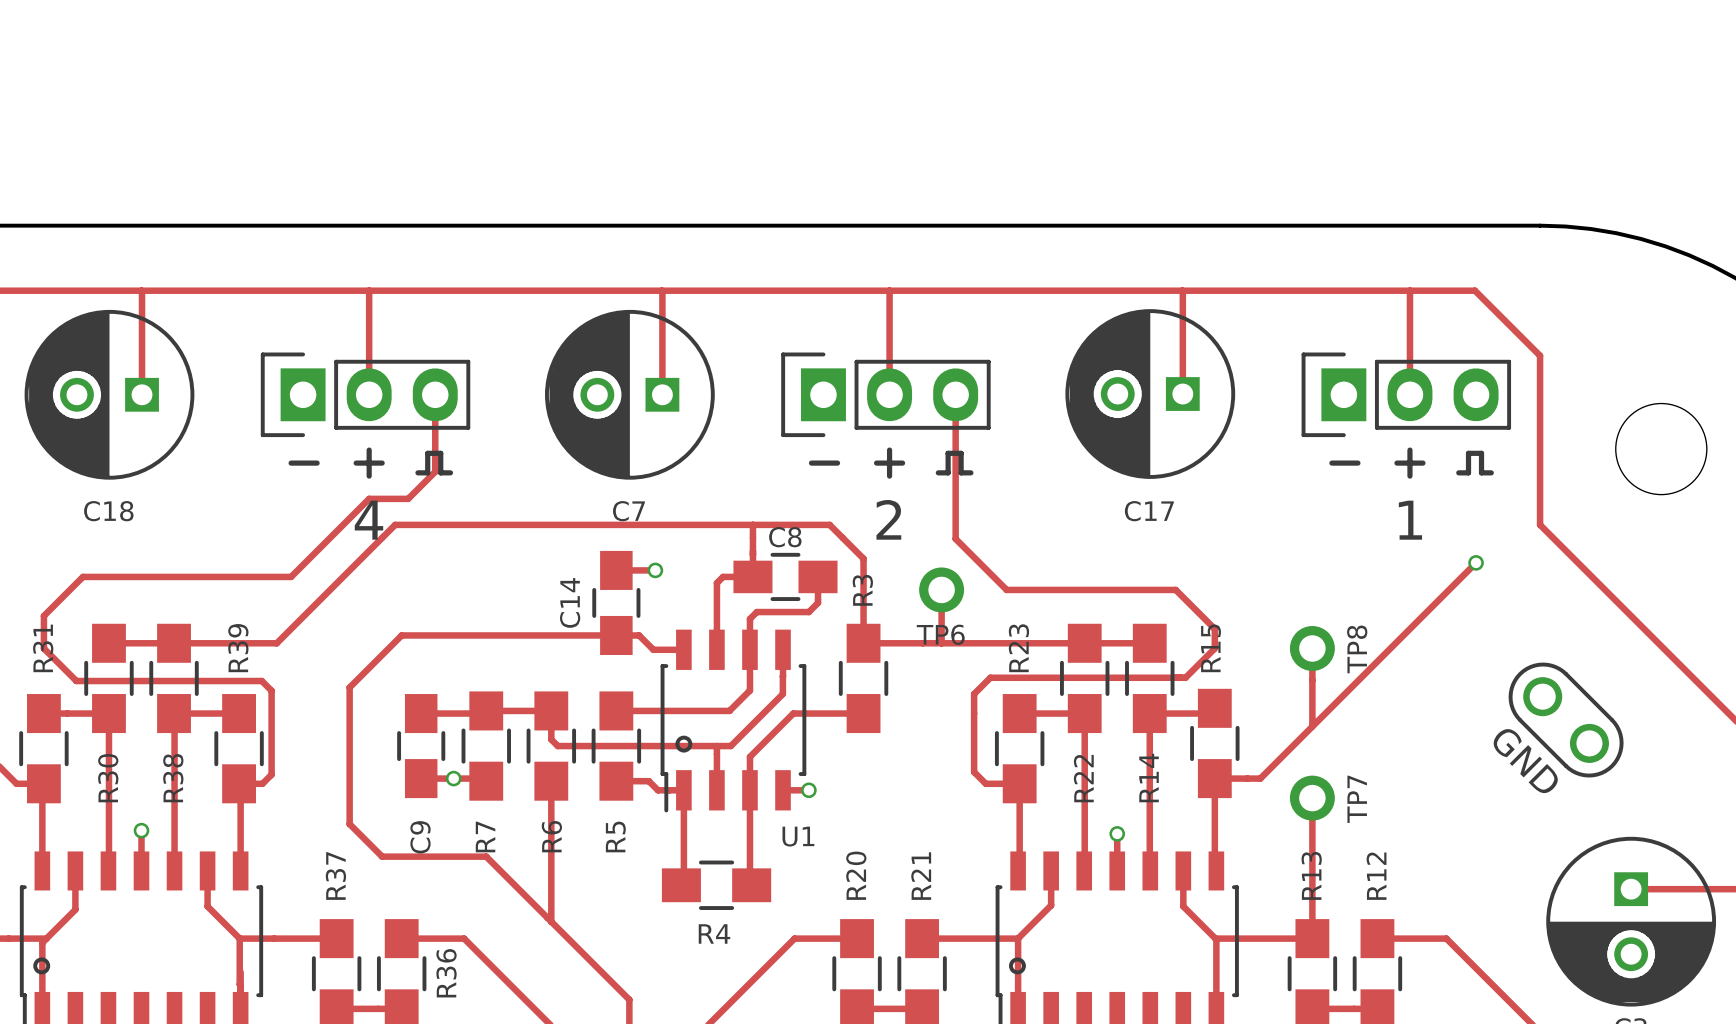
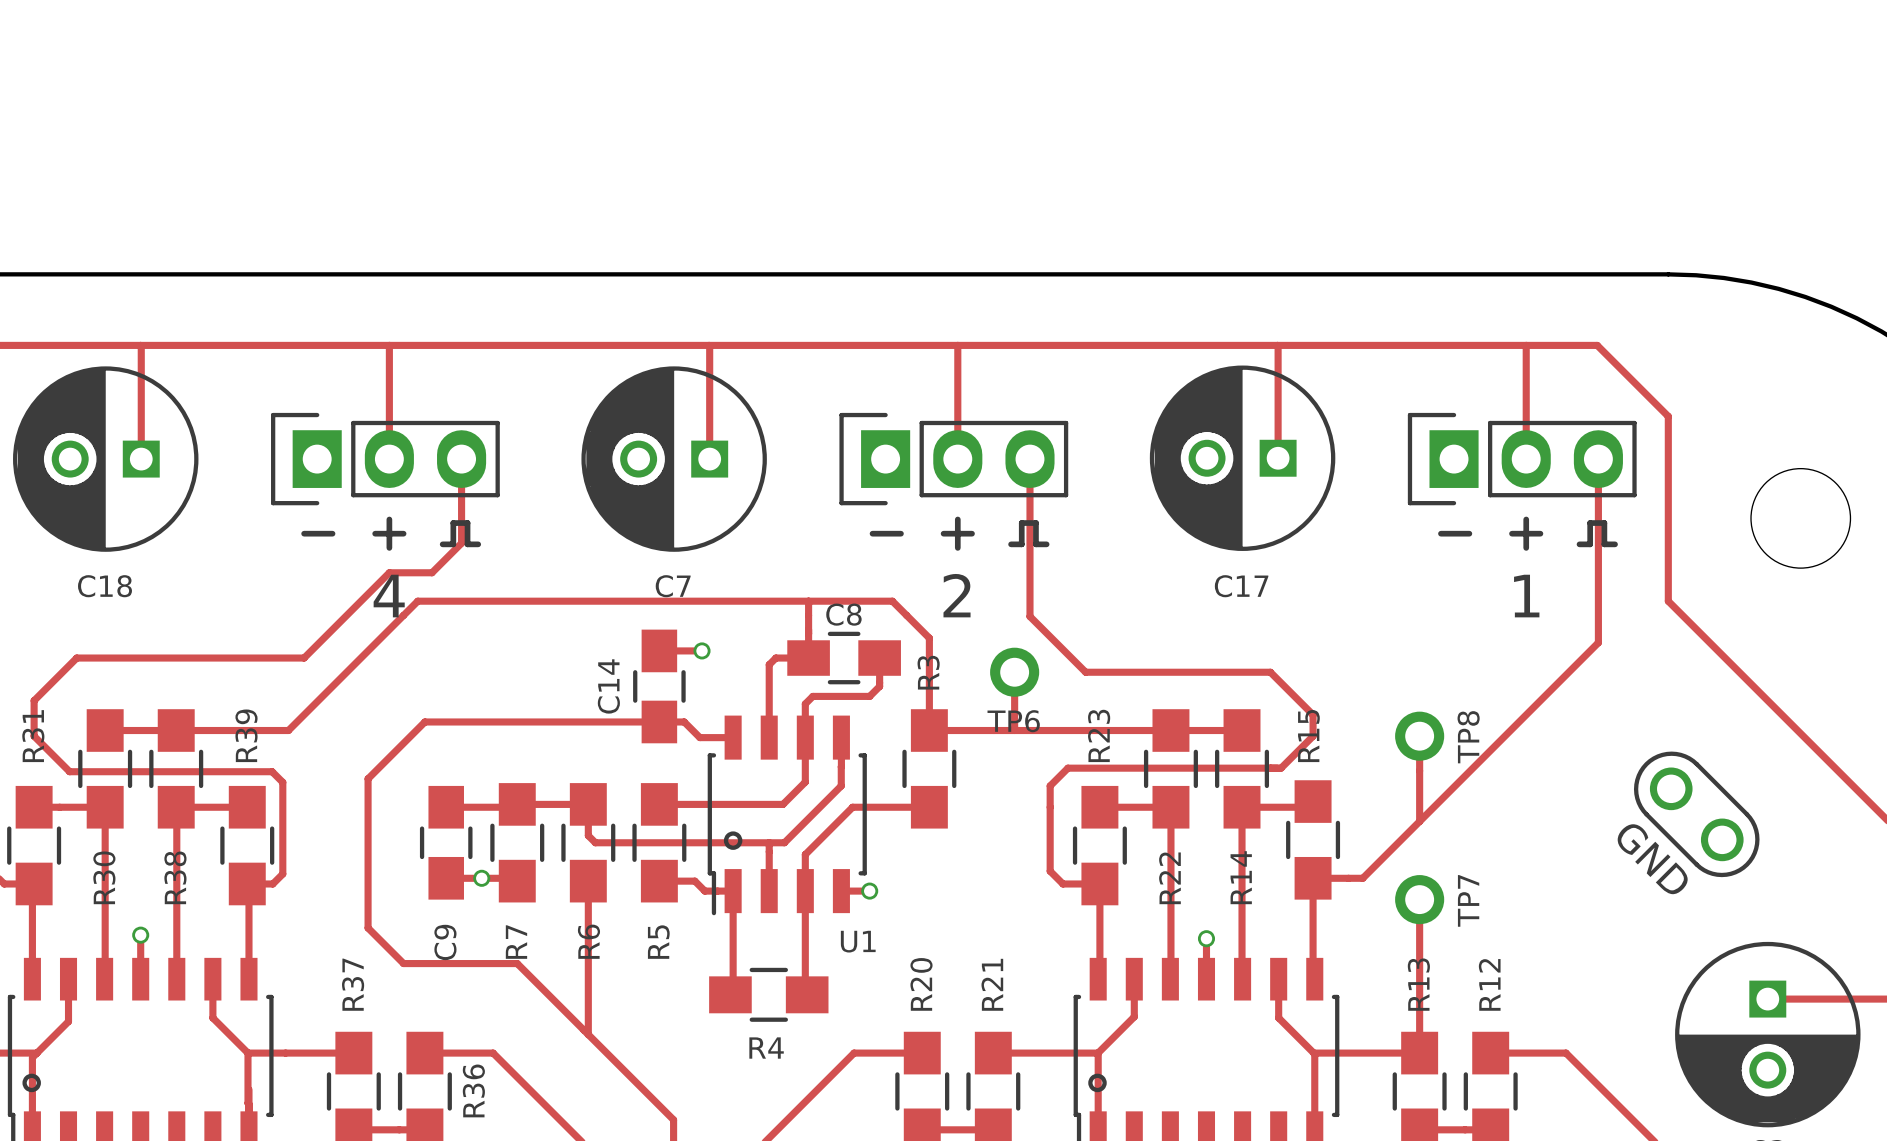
track: none -> (1598, 459) (1598, 642)
via: (1476, 562) -> none

